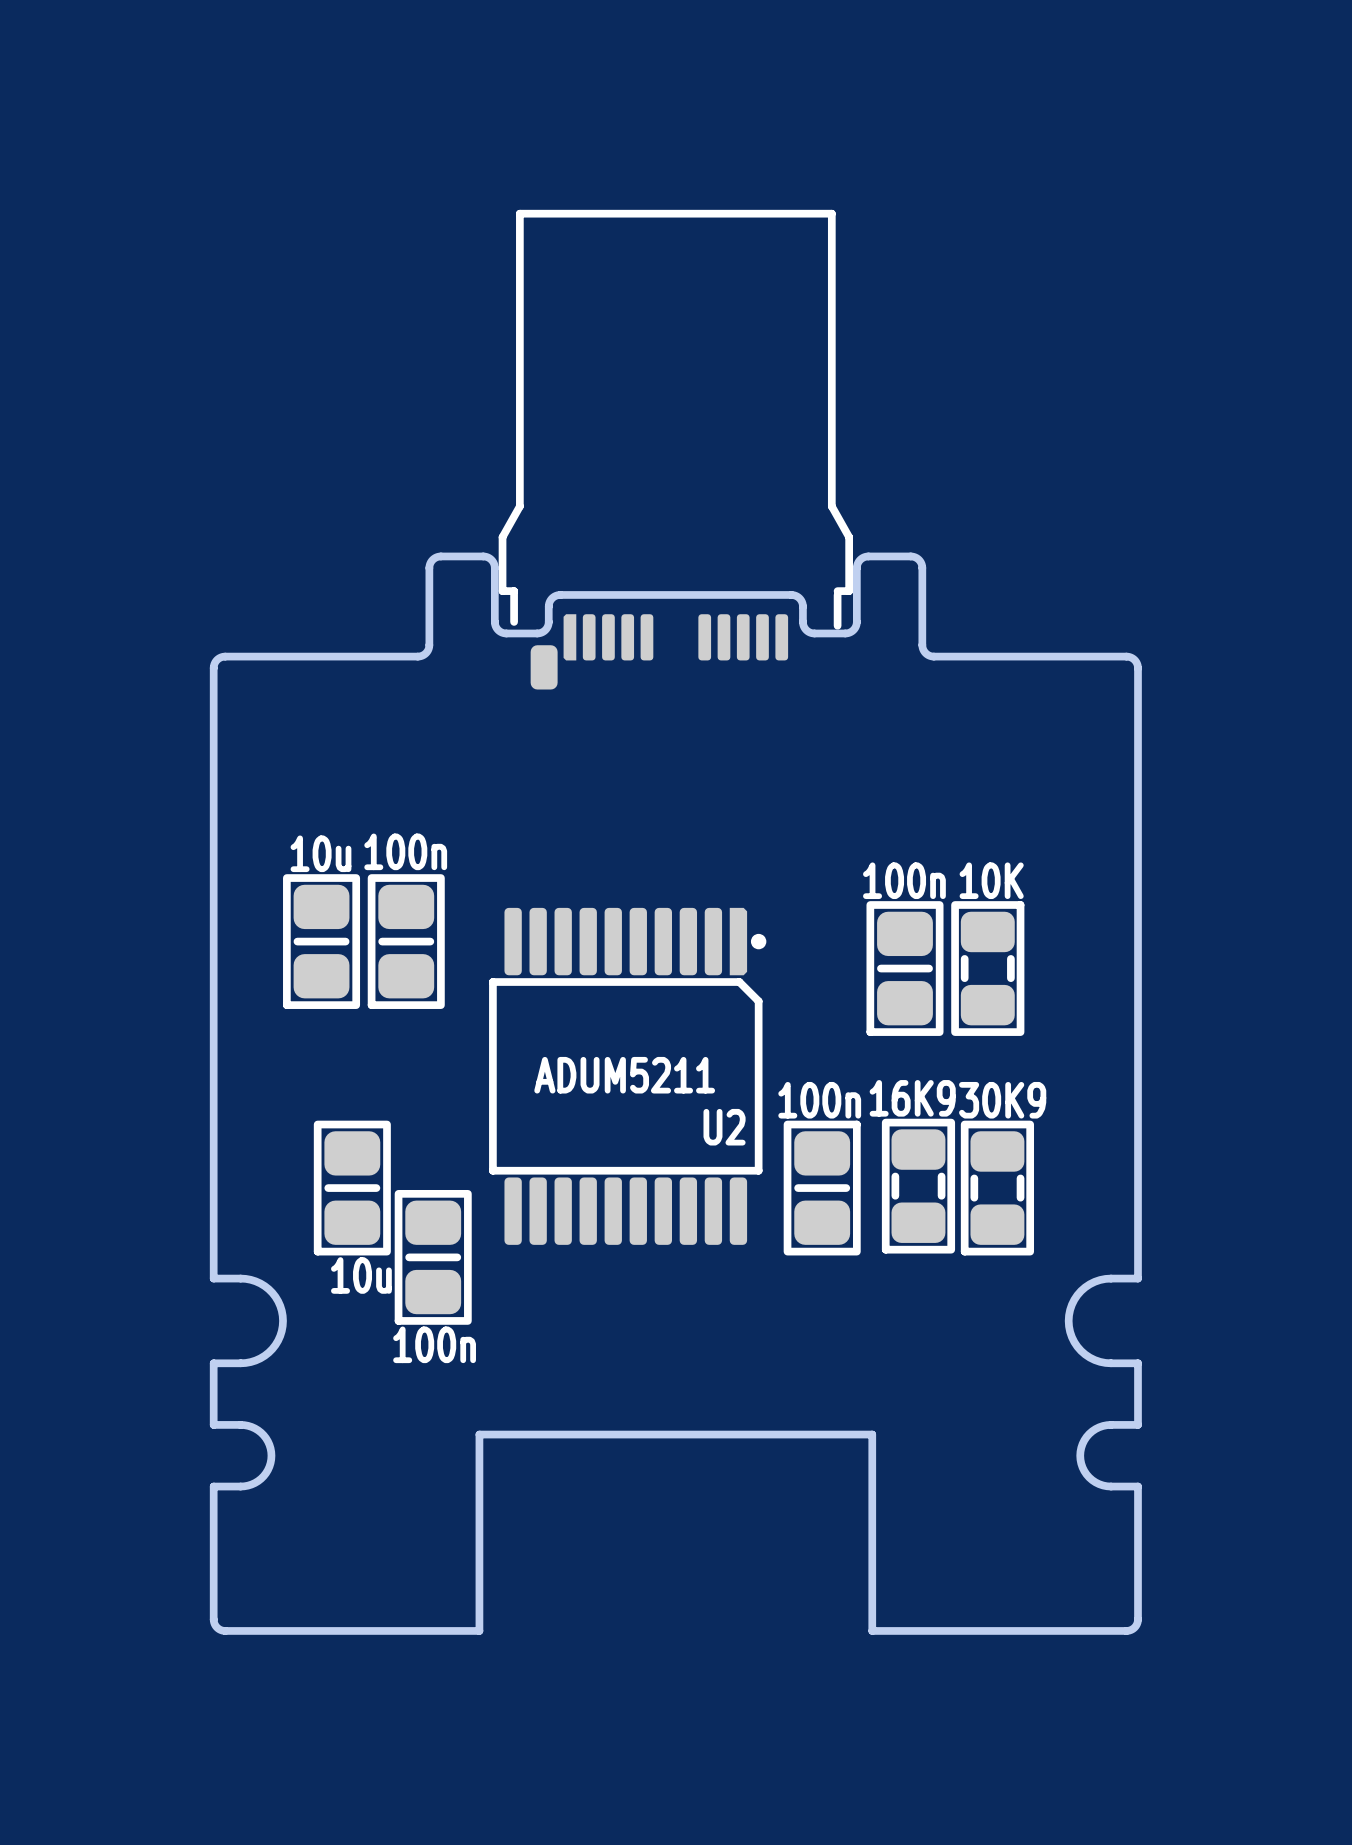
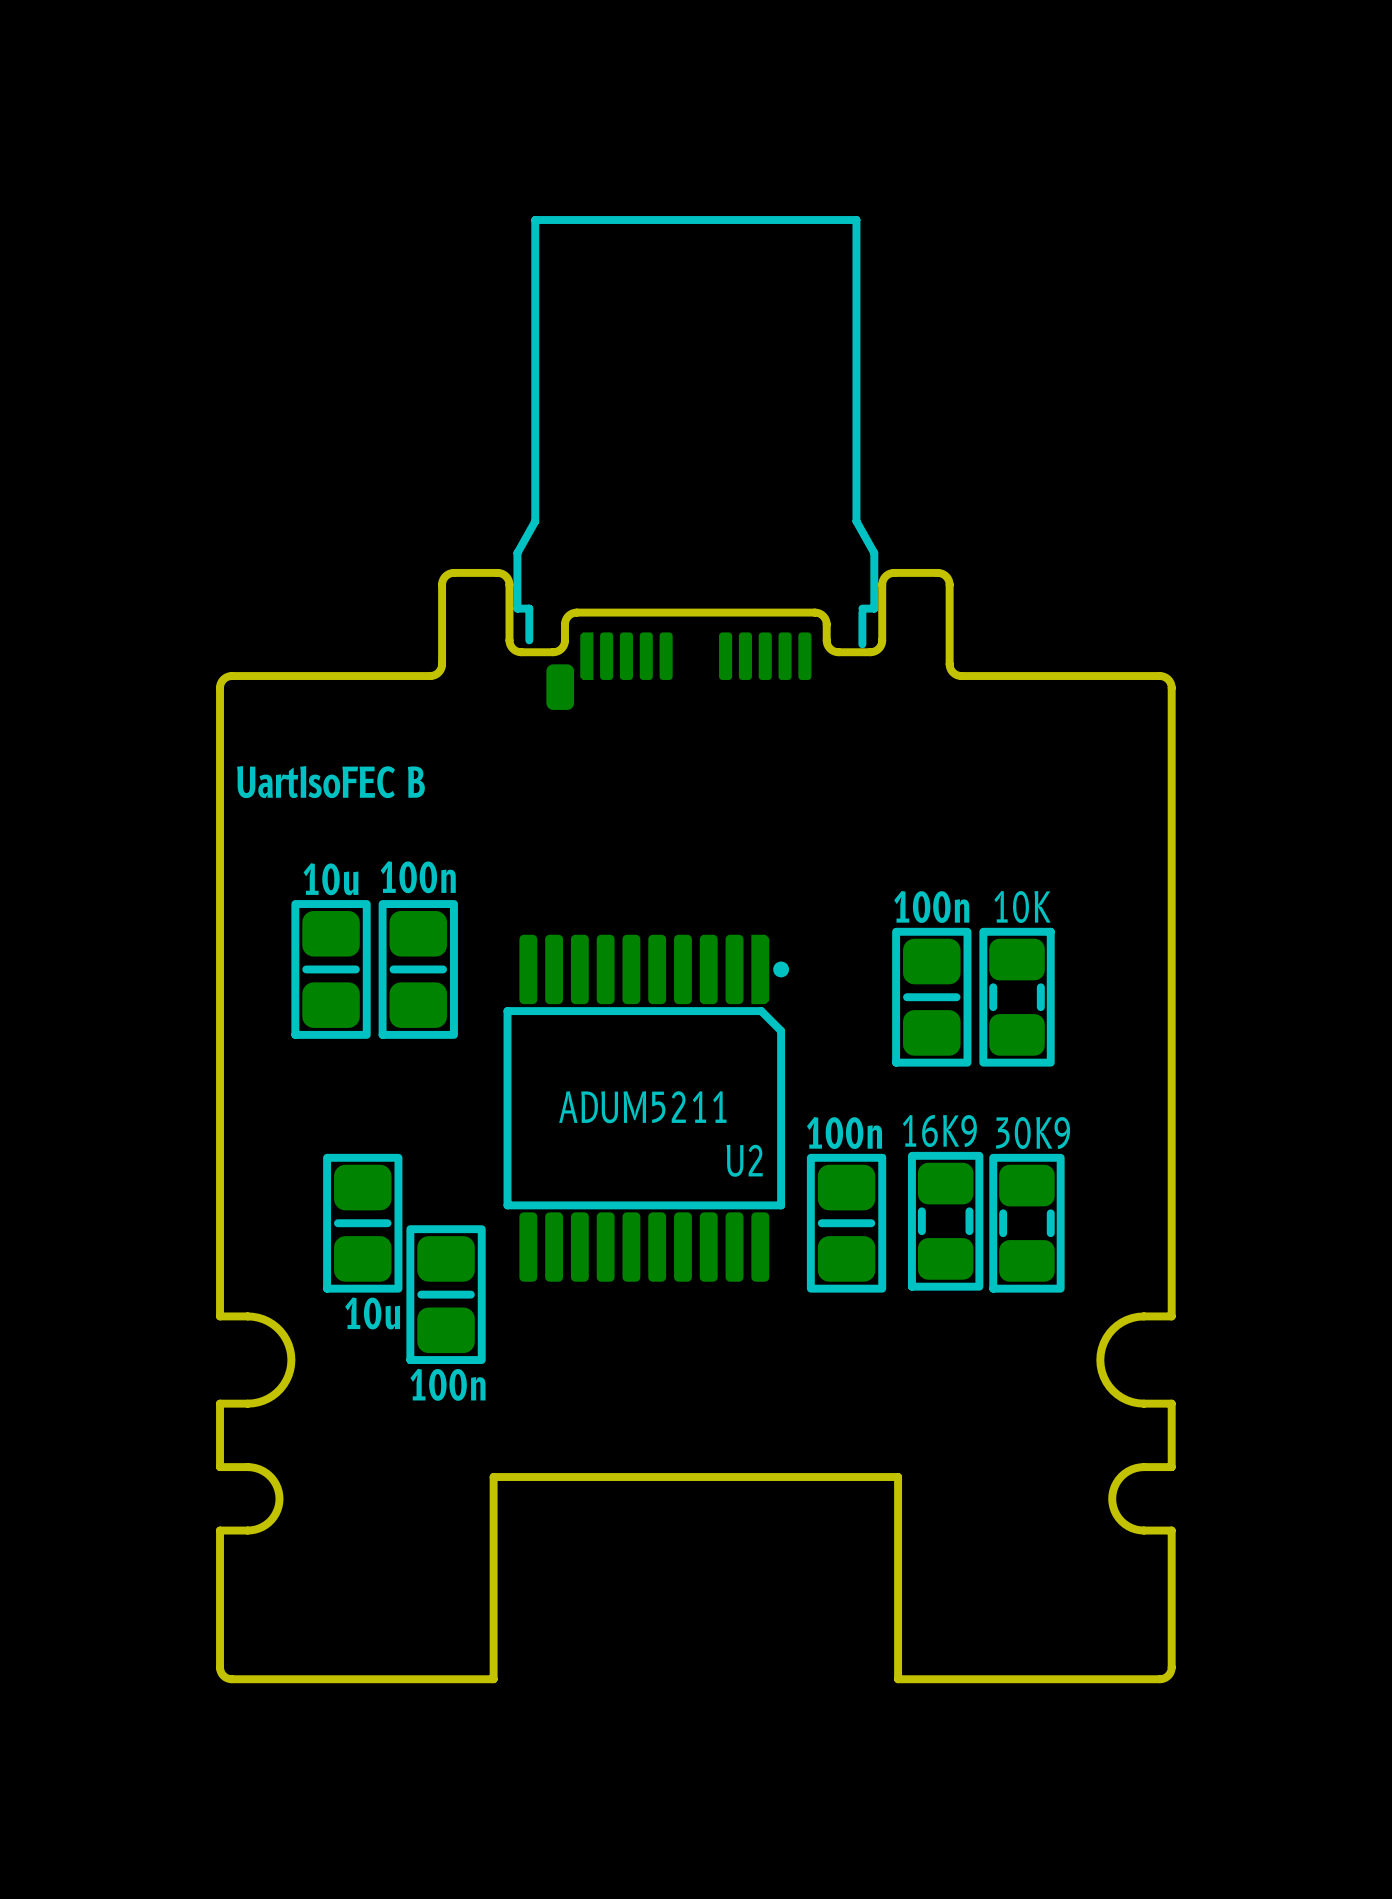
text: none -> UartIsoFEC B (330, 782)

